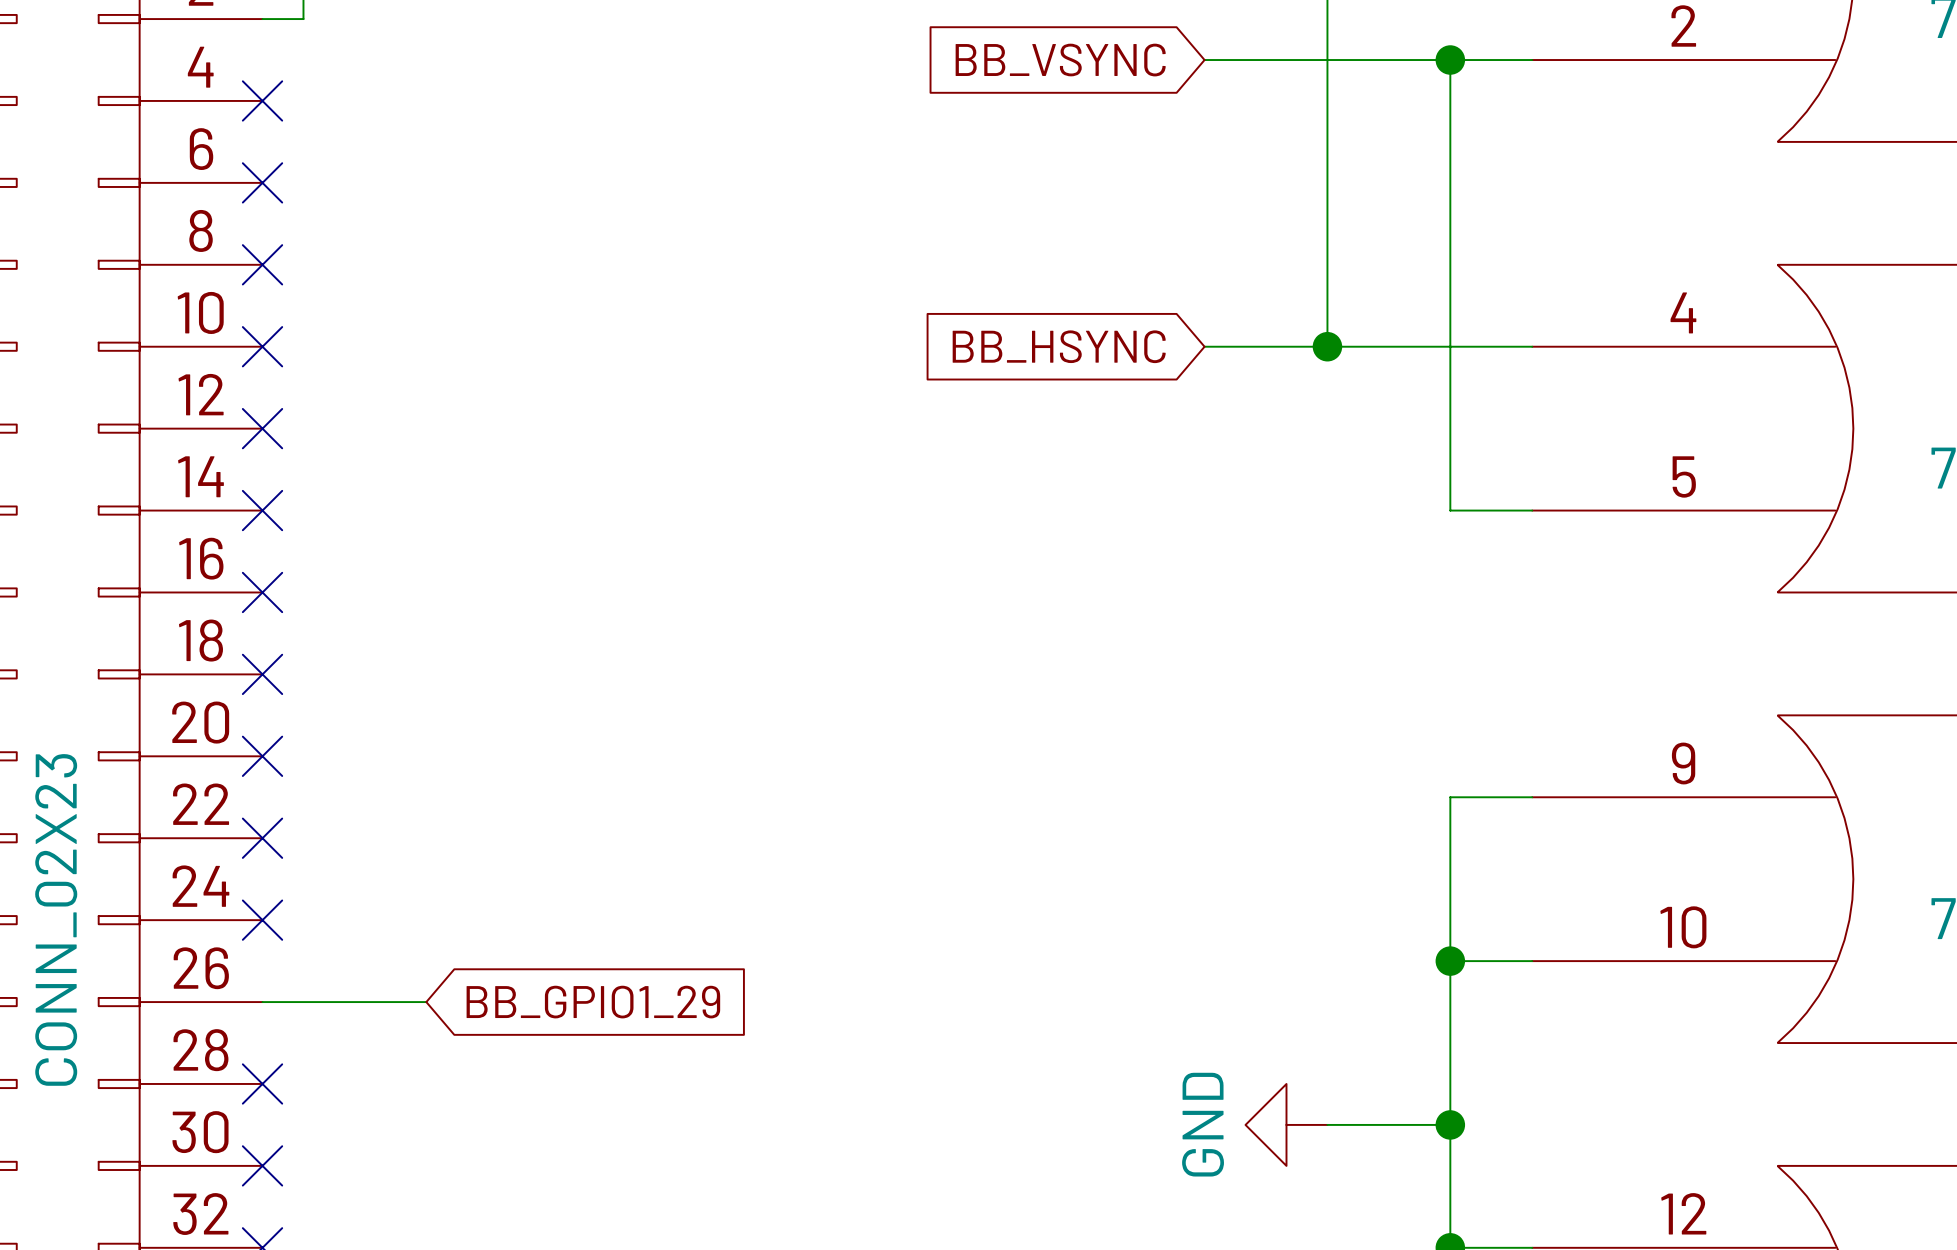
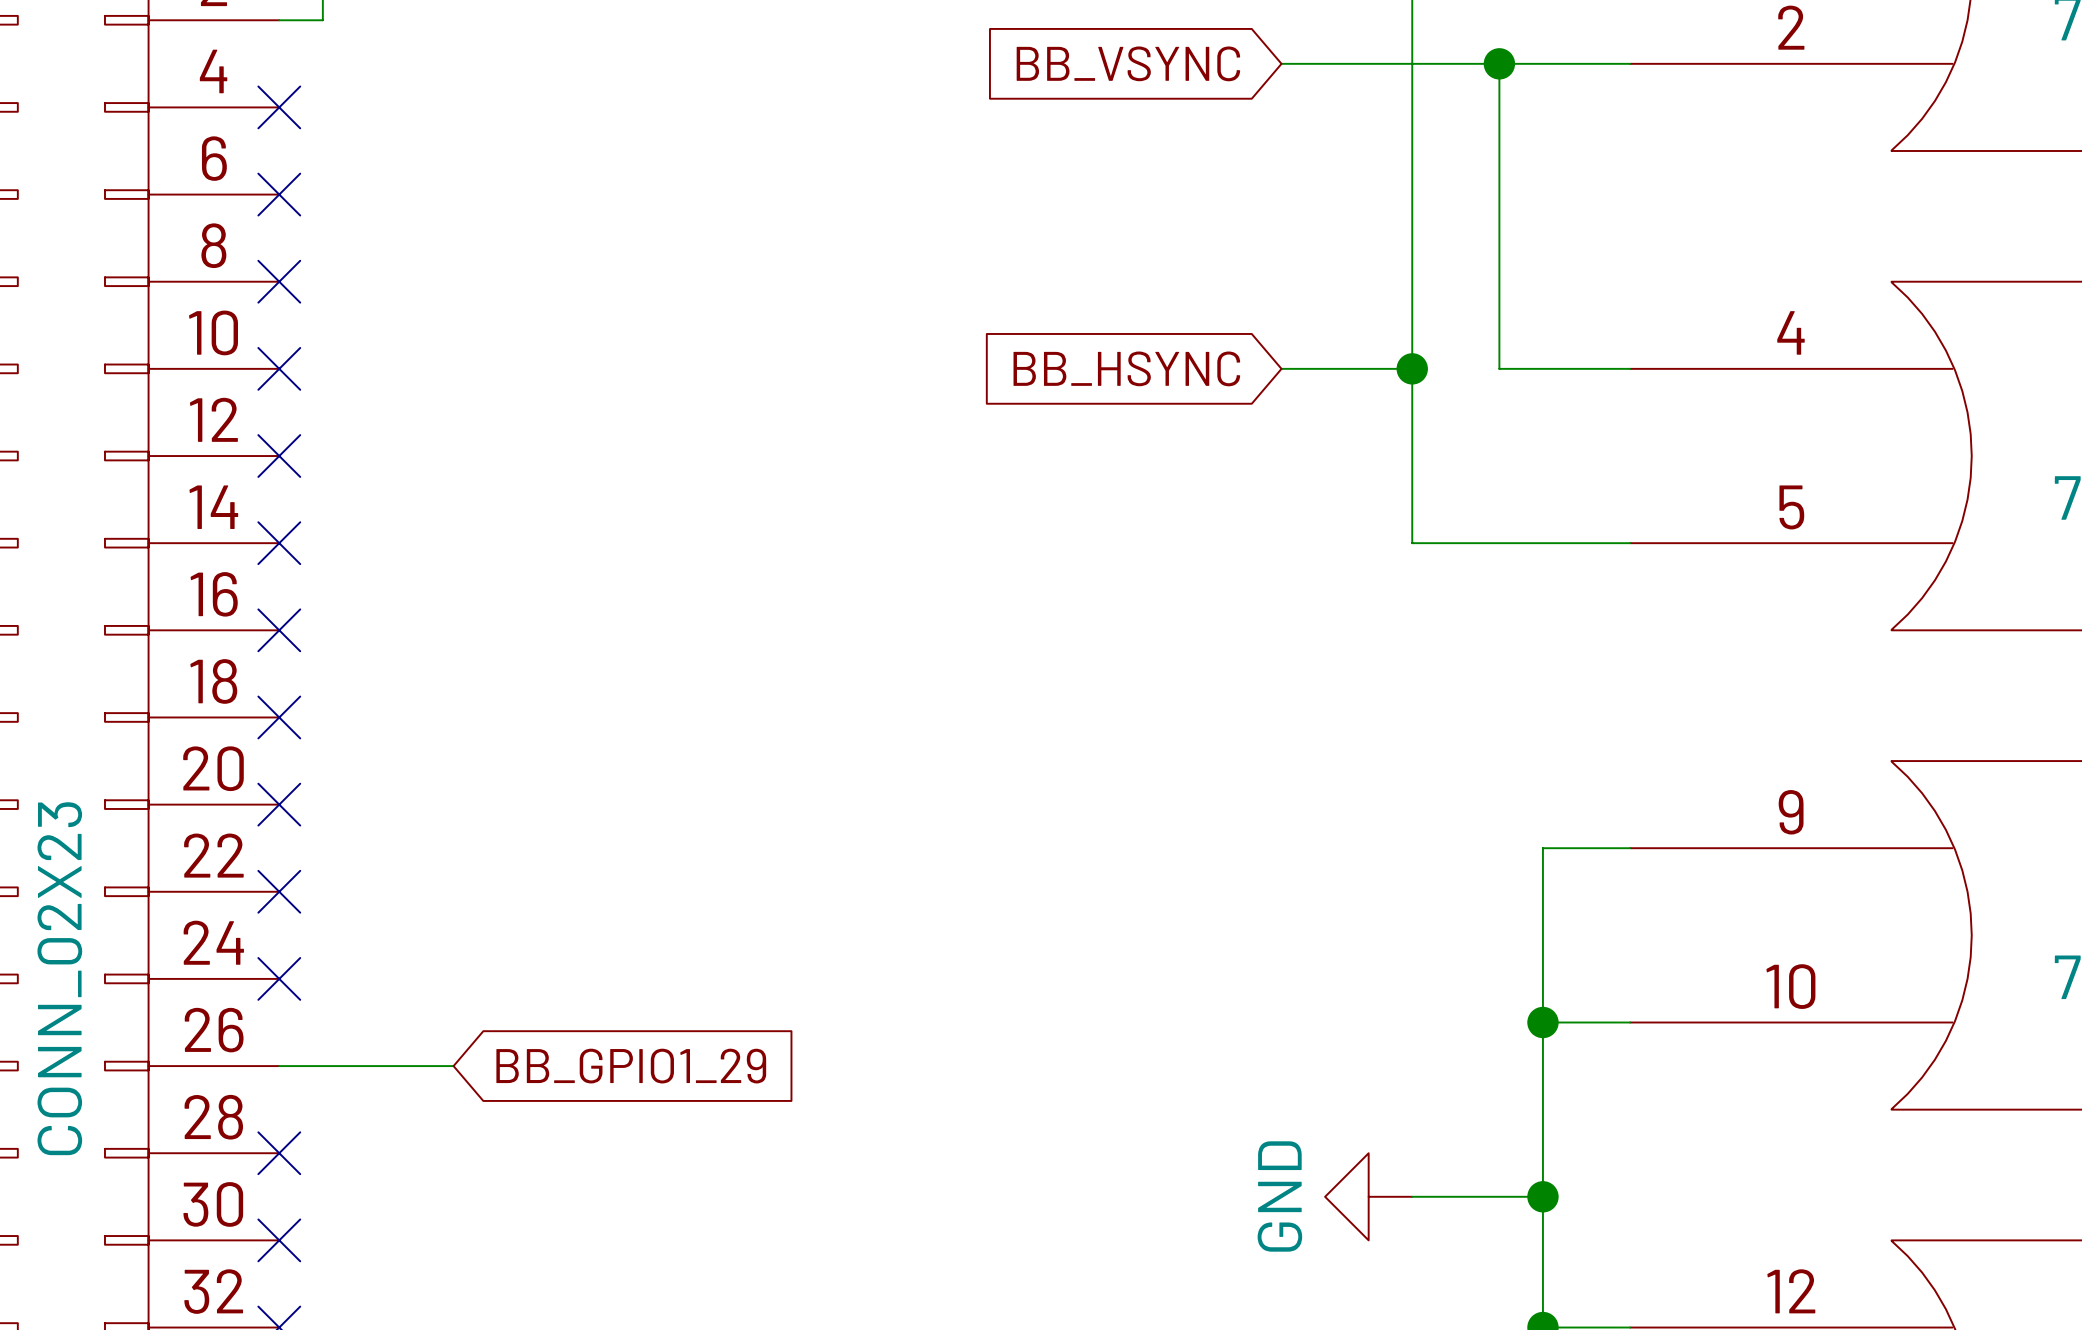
wire: none -> (1499, 63) (1499, 368)
wire: (1450, 60) (1450, 510) -> none
junction position: (1450, 60) -> (1499, 63)
wire: (1327, 346) (1409, 346) -> (1412, 368) (1412, 543) (1542, 543)

